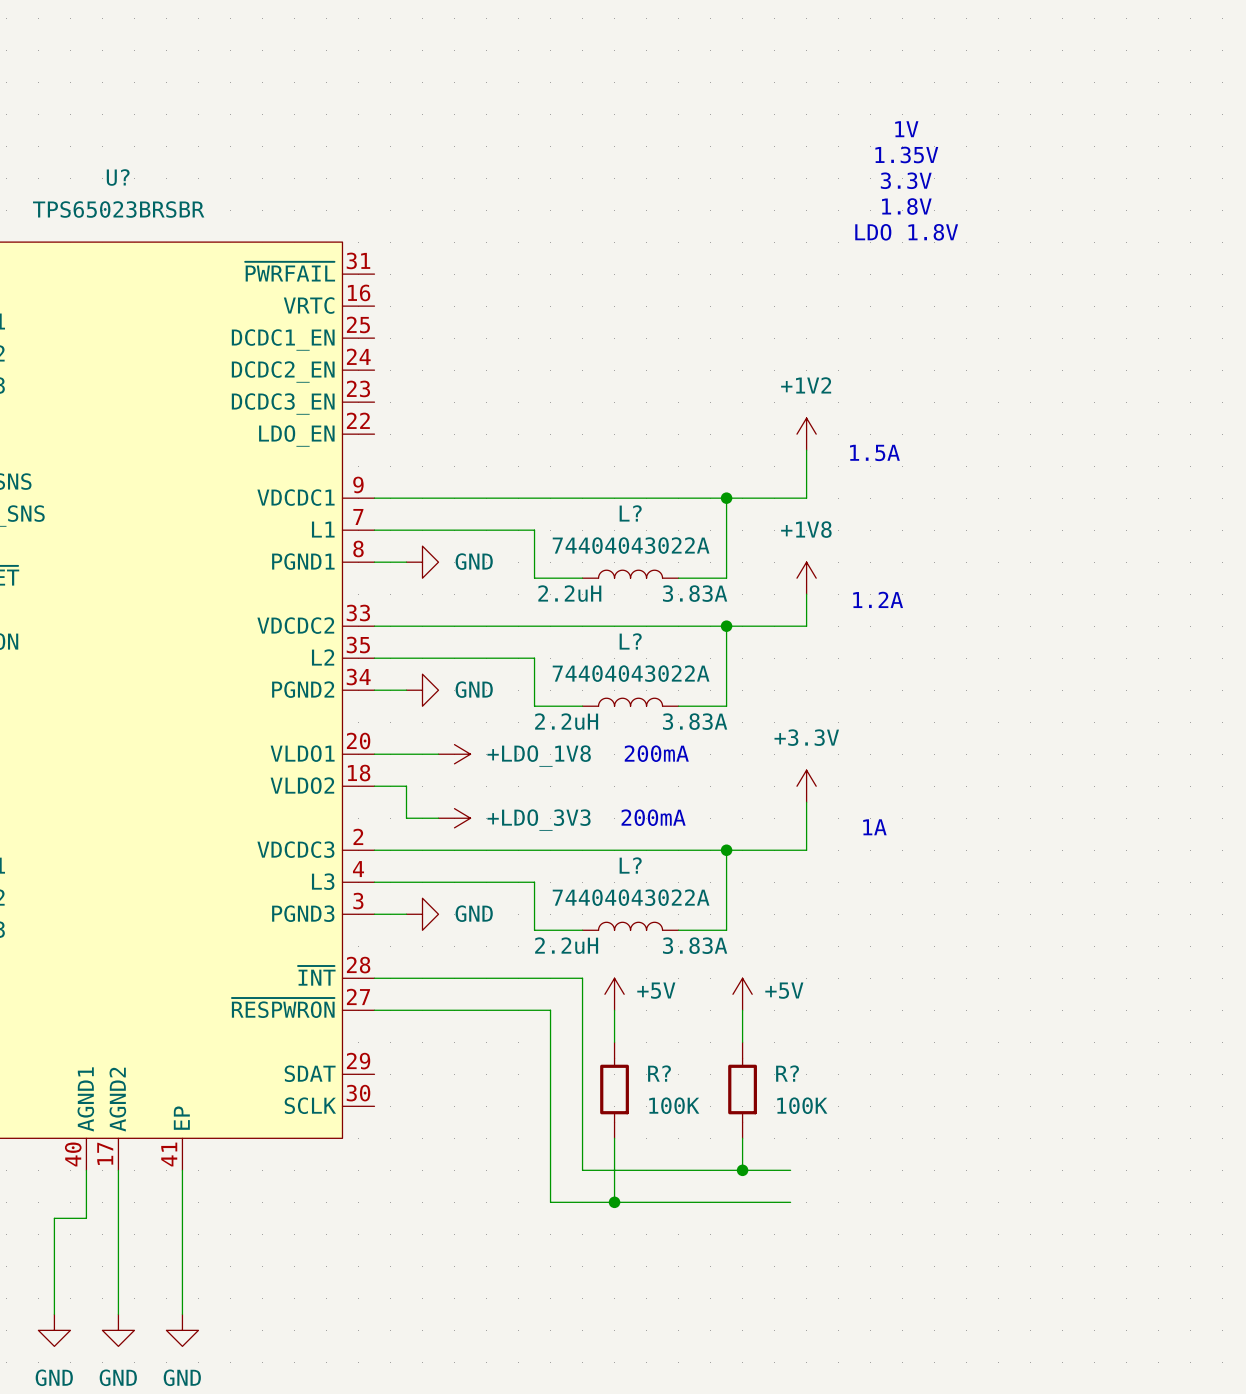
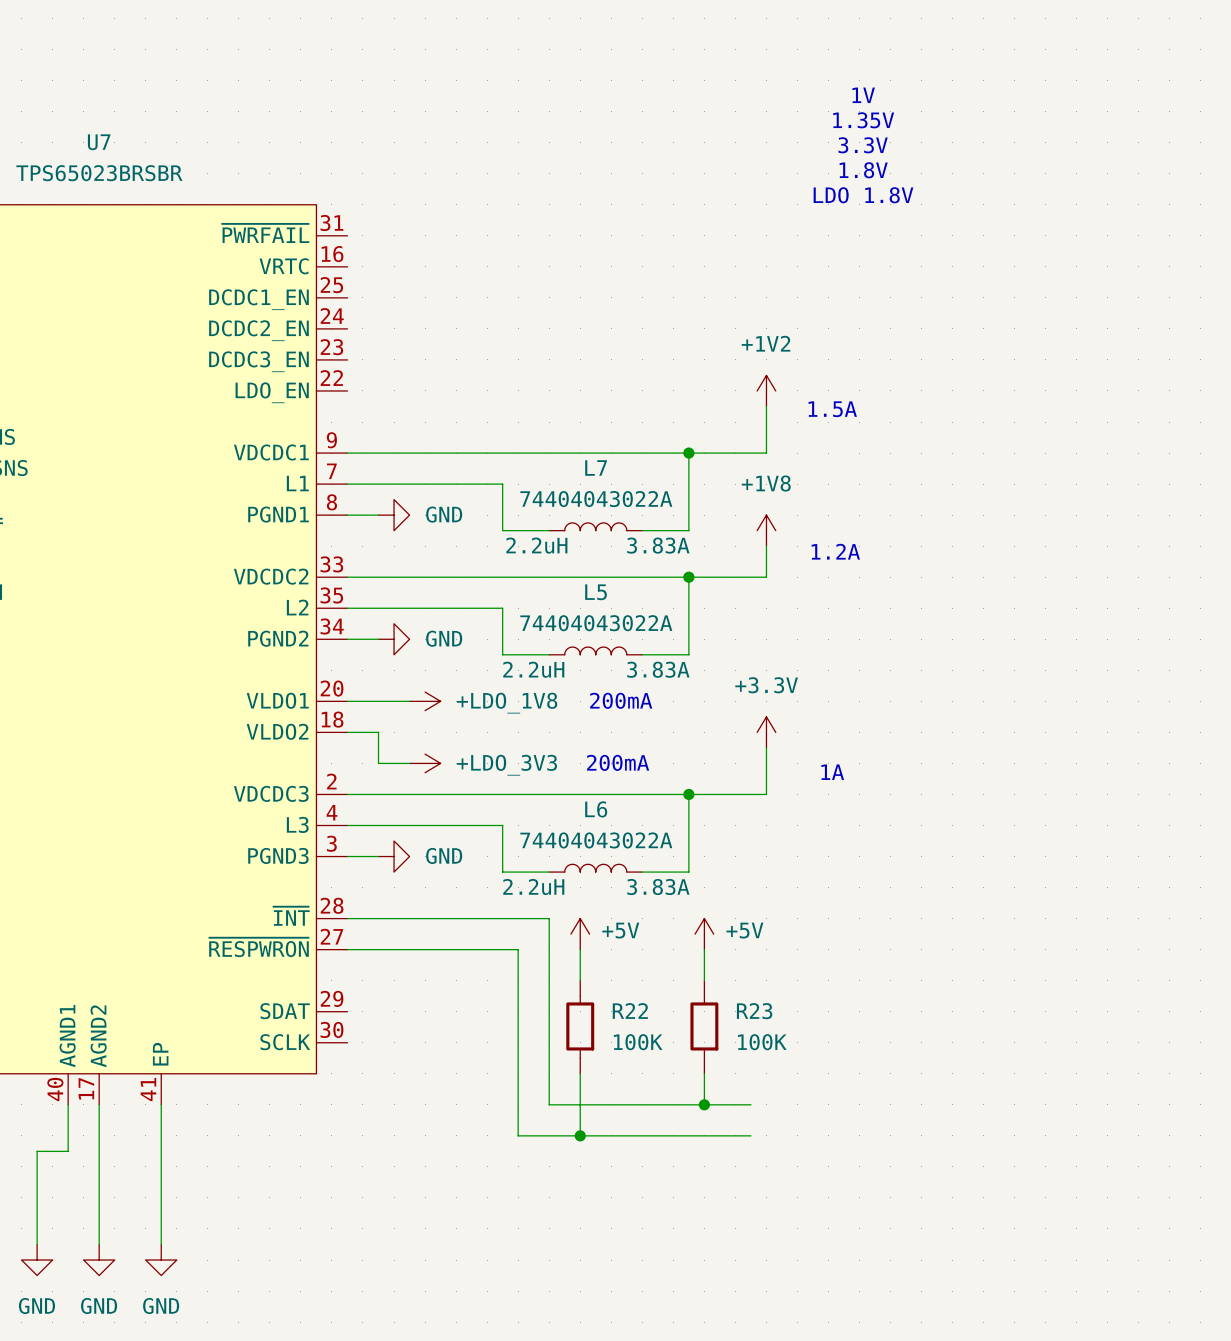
U? name: U? (118, 177) -> U7 (99, 142)
L? name: L? (630, 513) -> L7 (596, 468)
L? name: L? (630, 641) -> L5 (596, 592)
L? name: L? (630, 865) -> L6 (596, 809)
R? name: R? (659, 1073) -> R22 (630, 1010)
R? name: R? (787, 1073) -> R23 (754, 1011)

